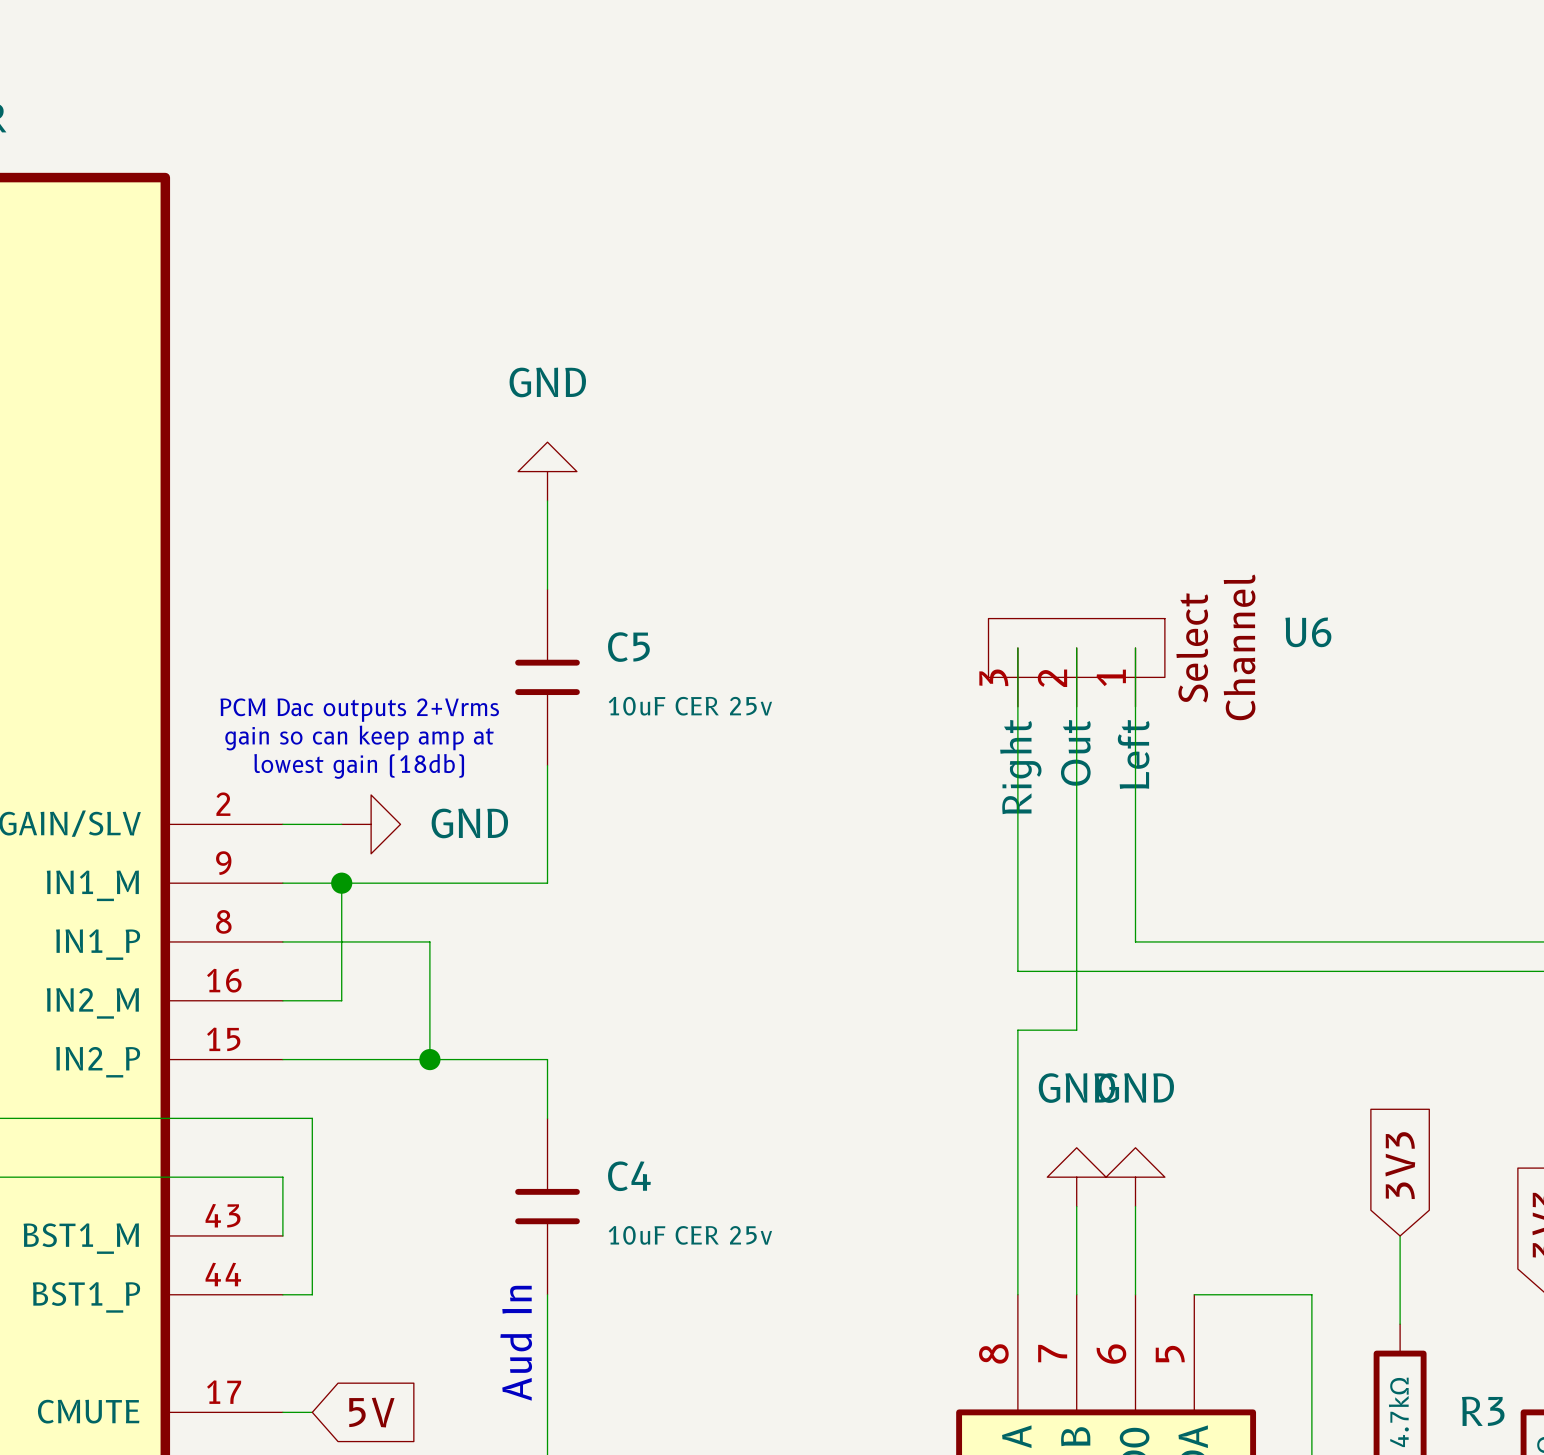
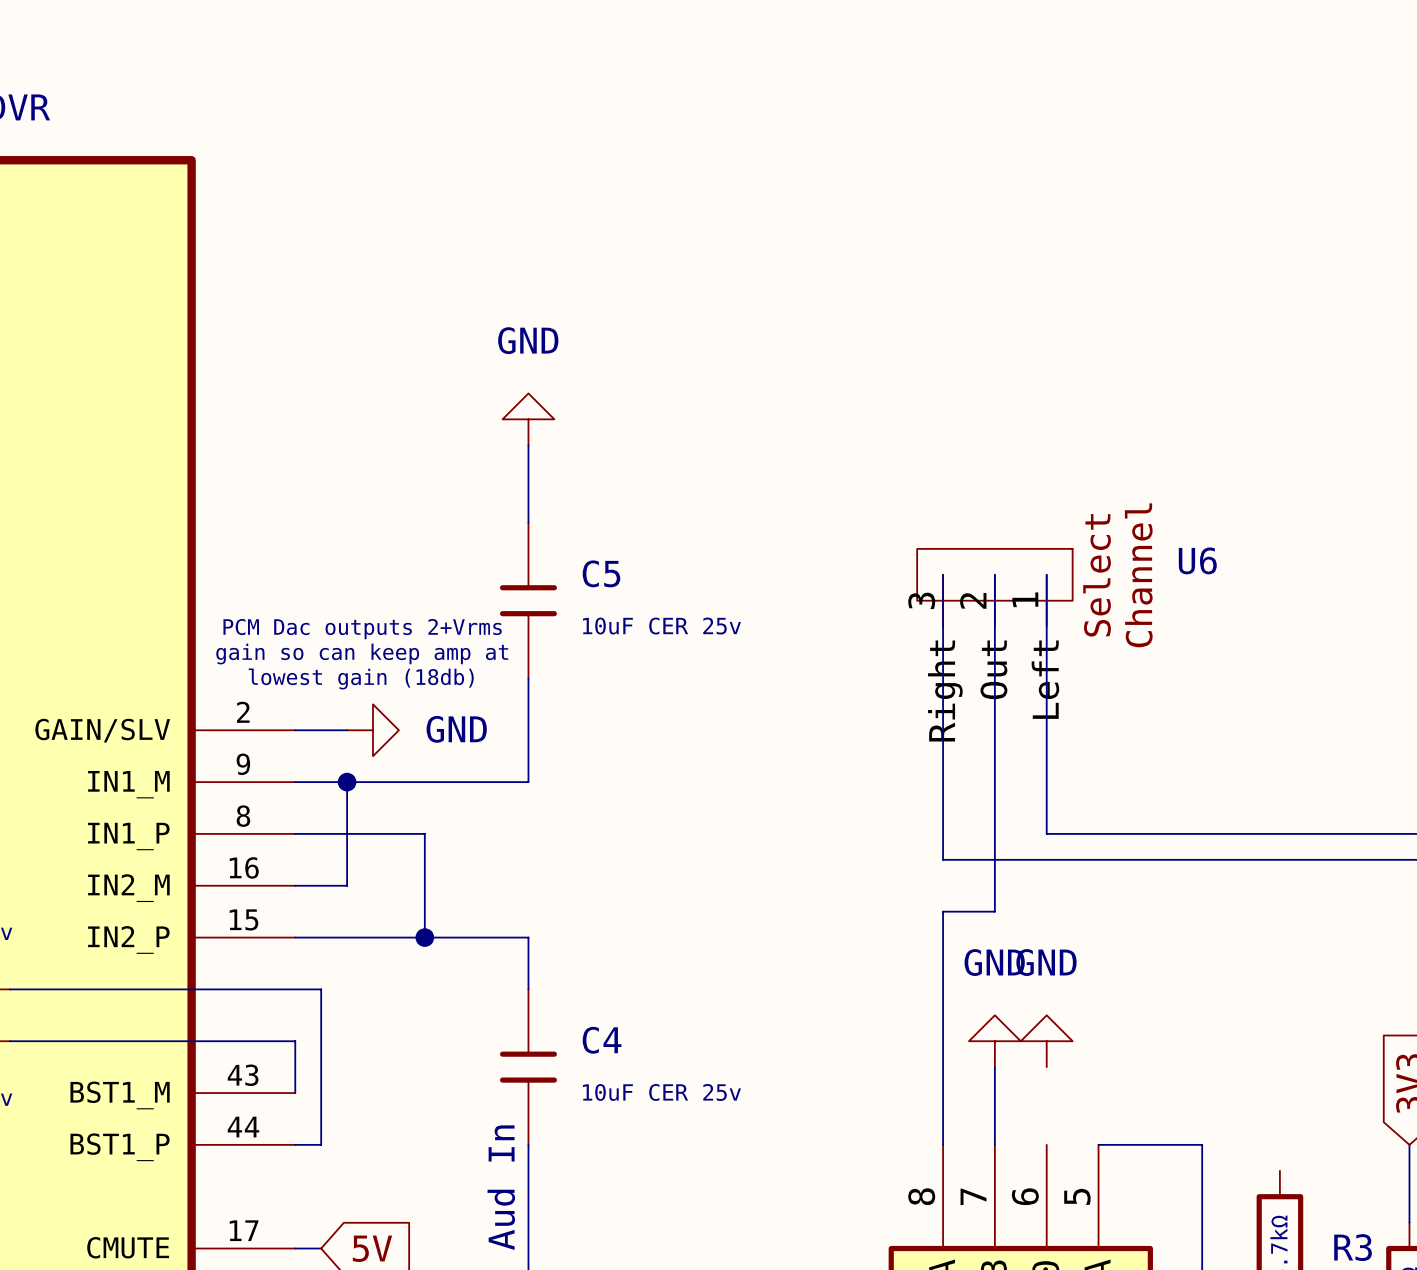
global label: 3V3 (1400, 1165) -> none
wire: (1135, 1206) (1135, 1294) -> none
wire: (1400, 1235) (1400, 1324) -> none

